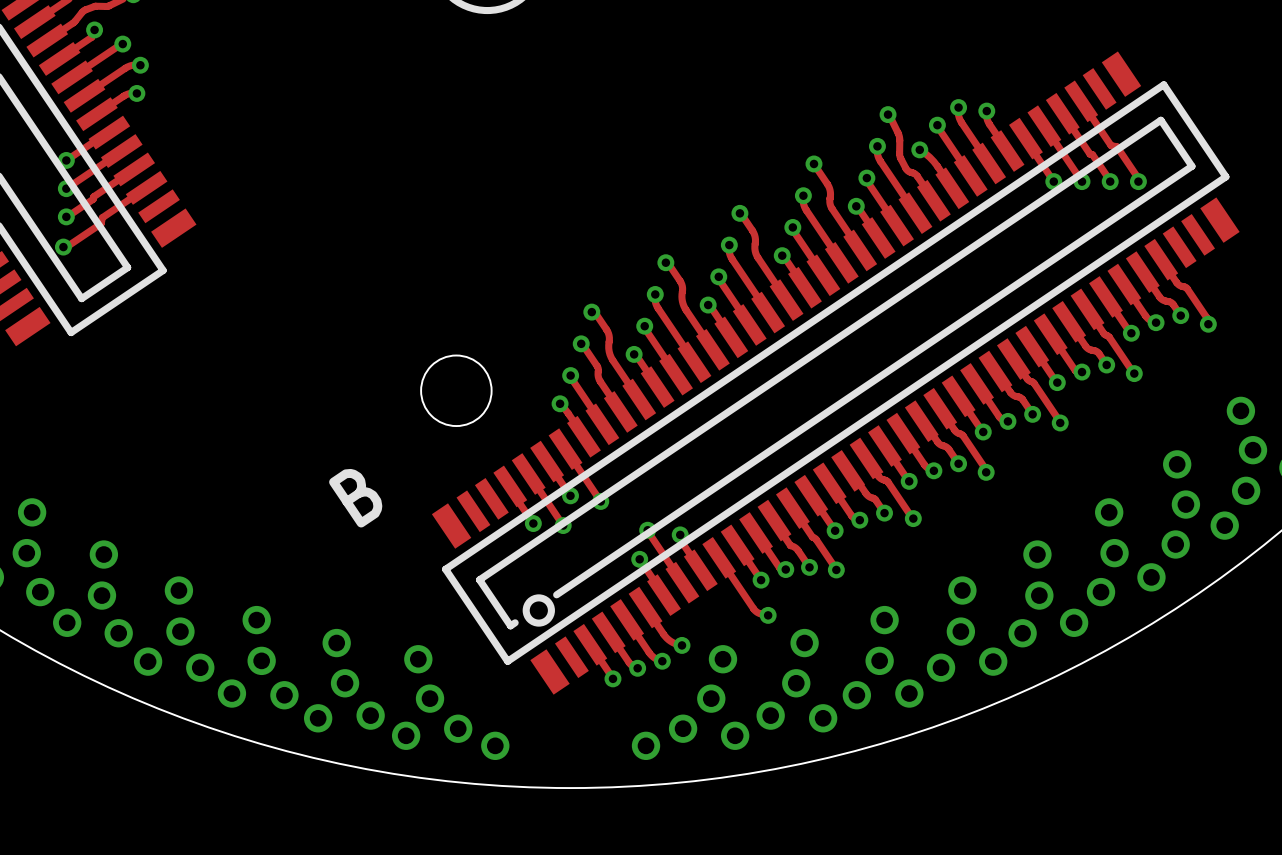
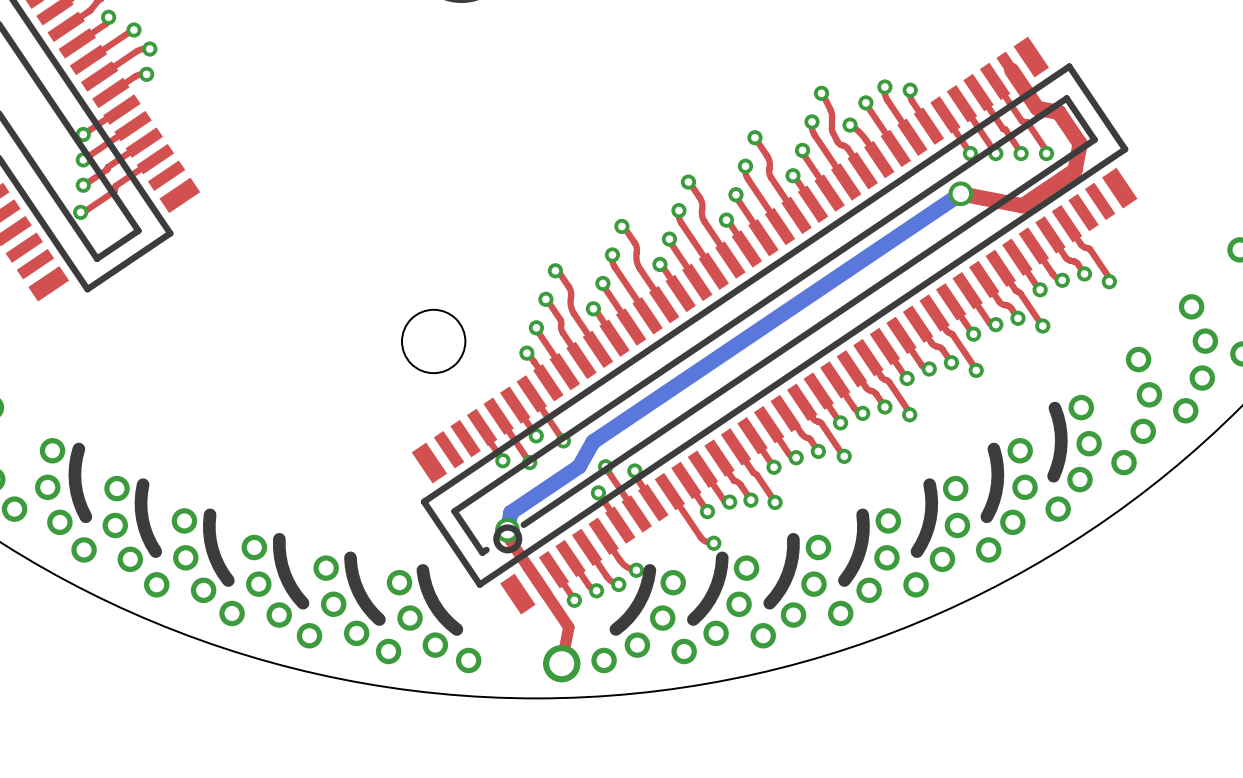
top track: none -> (1011, 70) (1037, 108) (1058, 112) (1080, 143) (1074, 170) (1022, 205) (960, 193)
bottom track: none -> (960, 193) (593, 441) (579, 466) (510, 512) (507, 530)
via: none -> (960, 193)
part footprint: [1137, 450, 1201, 592] -> [1045, 394, 1102, 522]
part footprint: [12, 498, 82, 637] -> [35, 438, 97, 563]
B name: B (355, 498) -> none
part footprint: [1059, 498, 1129, 637] -> [975, 438, 1038, 563]
part footprint: [87, 540, 163, 676] -> [102, 475, 170, 598]
part footprint: [979, 540, 1054, 676] -> [903, 475, 971, 598]
part footprint: [164, 576, 247, 708] -> [171, 508, 245, 627]
part footprint: [895, 576, 977, 708] -> [827, 508, 902, 627]
top track: none -> (507, 530) (509, 532) (506, 534) (568, 627) (561, 663)
via: none -> (507, 530)
part footprint: [242, 605, 333, 733] -> [241, 532, 323, 649]
part footprint: [808, 605, 899, 733] -> [750, 532, 832, 649]
part footprint: [322, 628, 421, 750] -> [313, 551, 402, 665]
part footprint: [720, 628, 819, 750] -> [671, 551, 760, 665]
part footprint: [404, 645, 510, 761] -> [386, 564, 482, 674]
part footprint: [631, 645, 738, 761] -> [591, 564, 686, 674]
part: none -> (561, 663)

